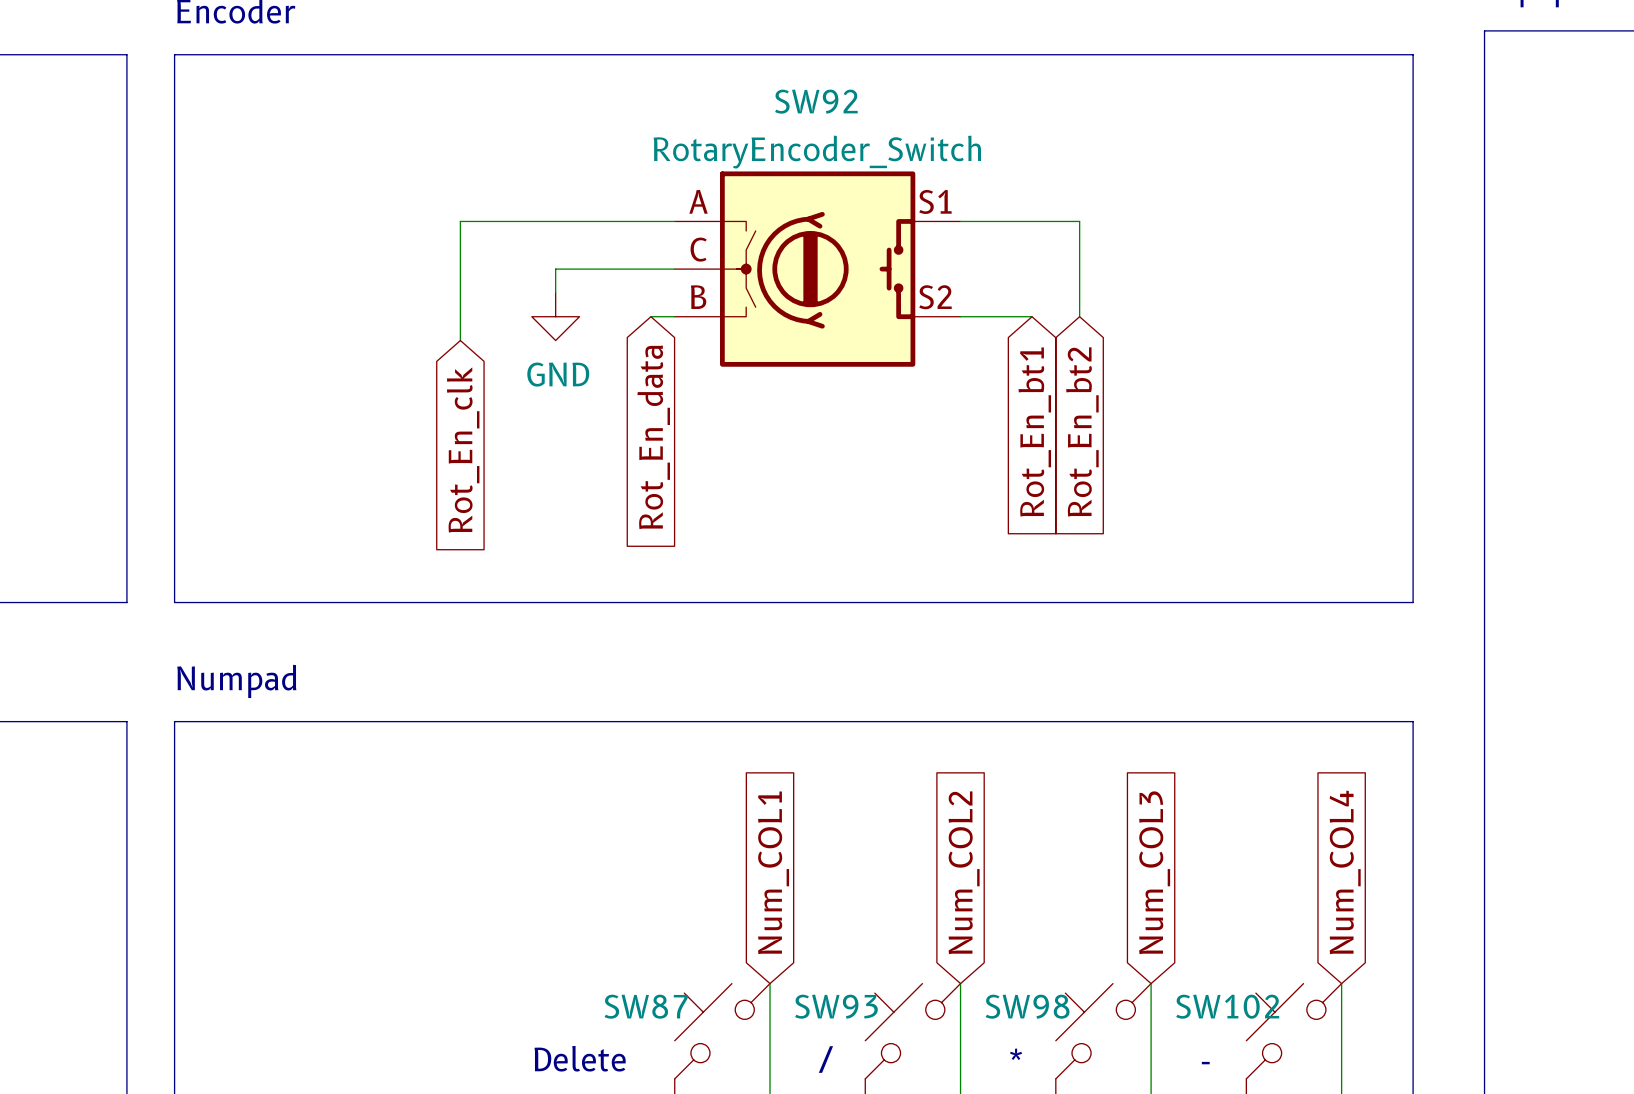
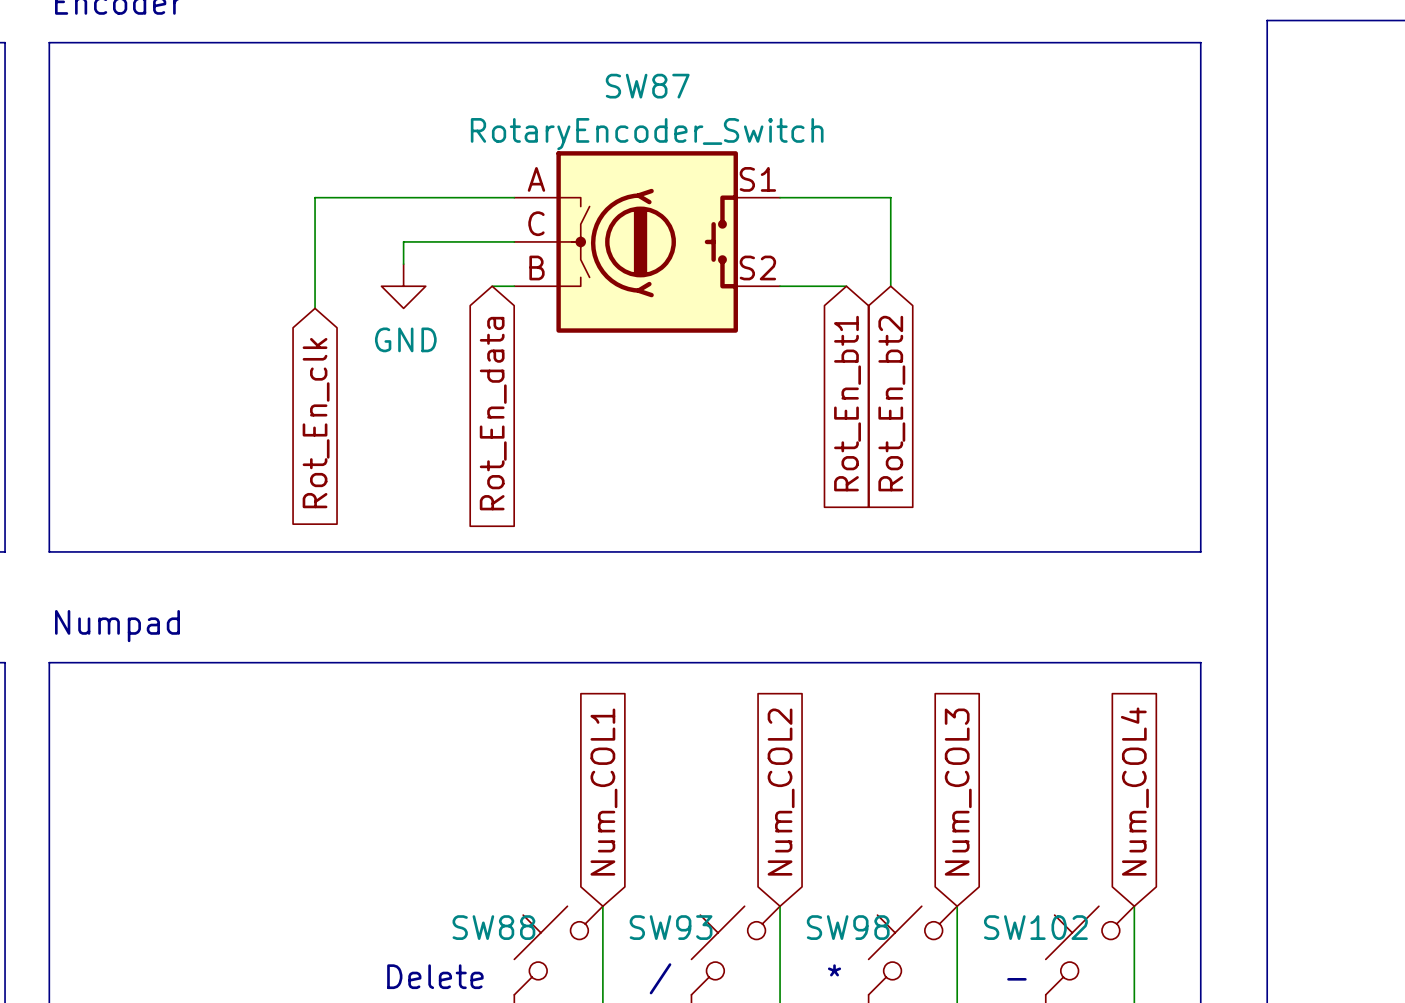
SW92 name: SW92 (816, 101) -> SW87 (647, 86)
SW87 name: SW87 (646, 1006) -> SW88 (493, 927)

